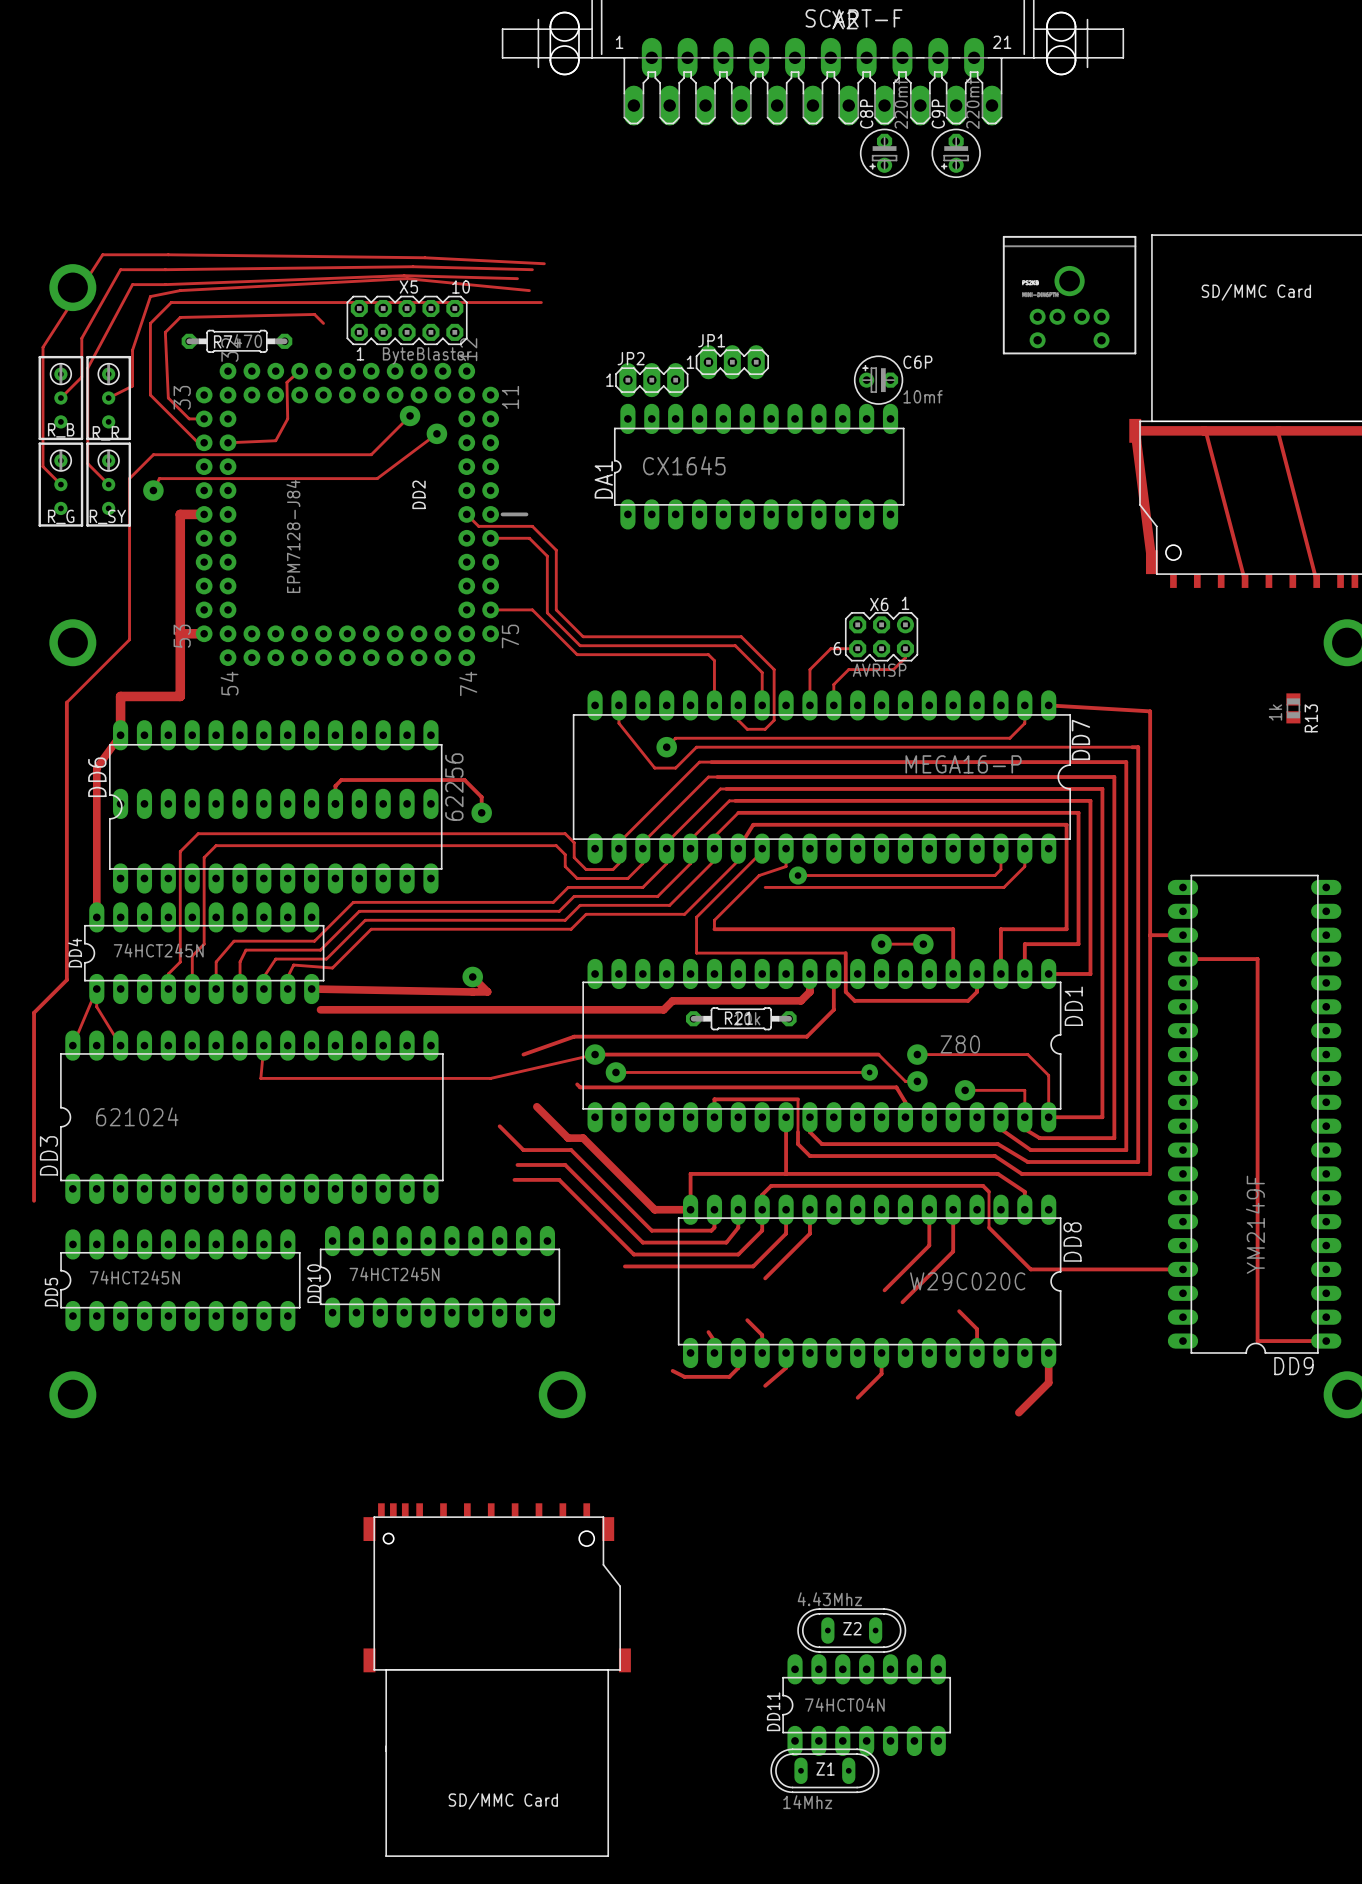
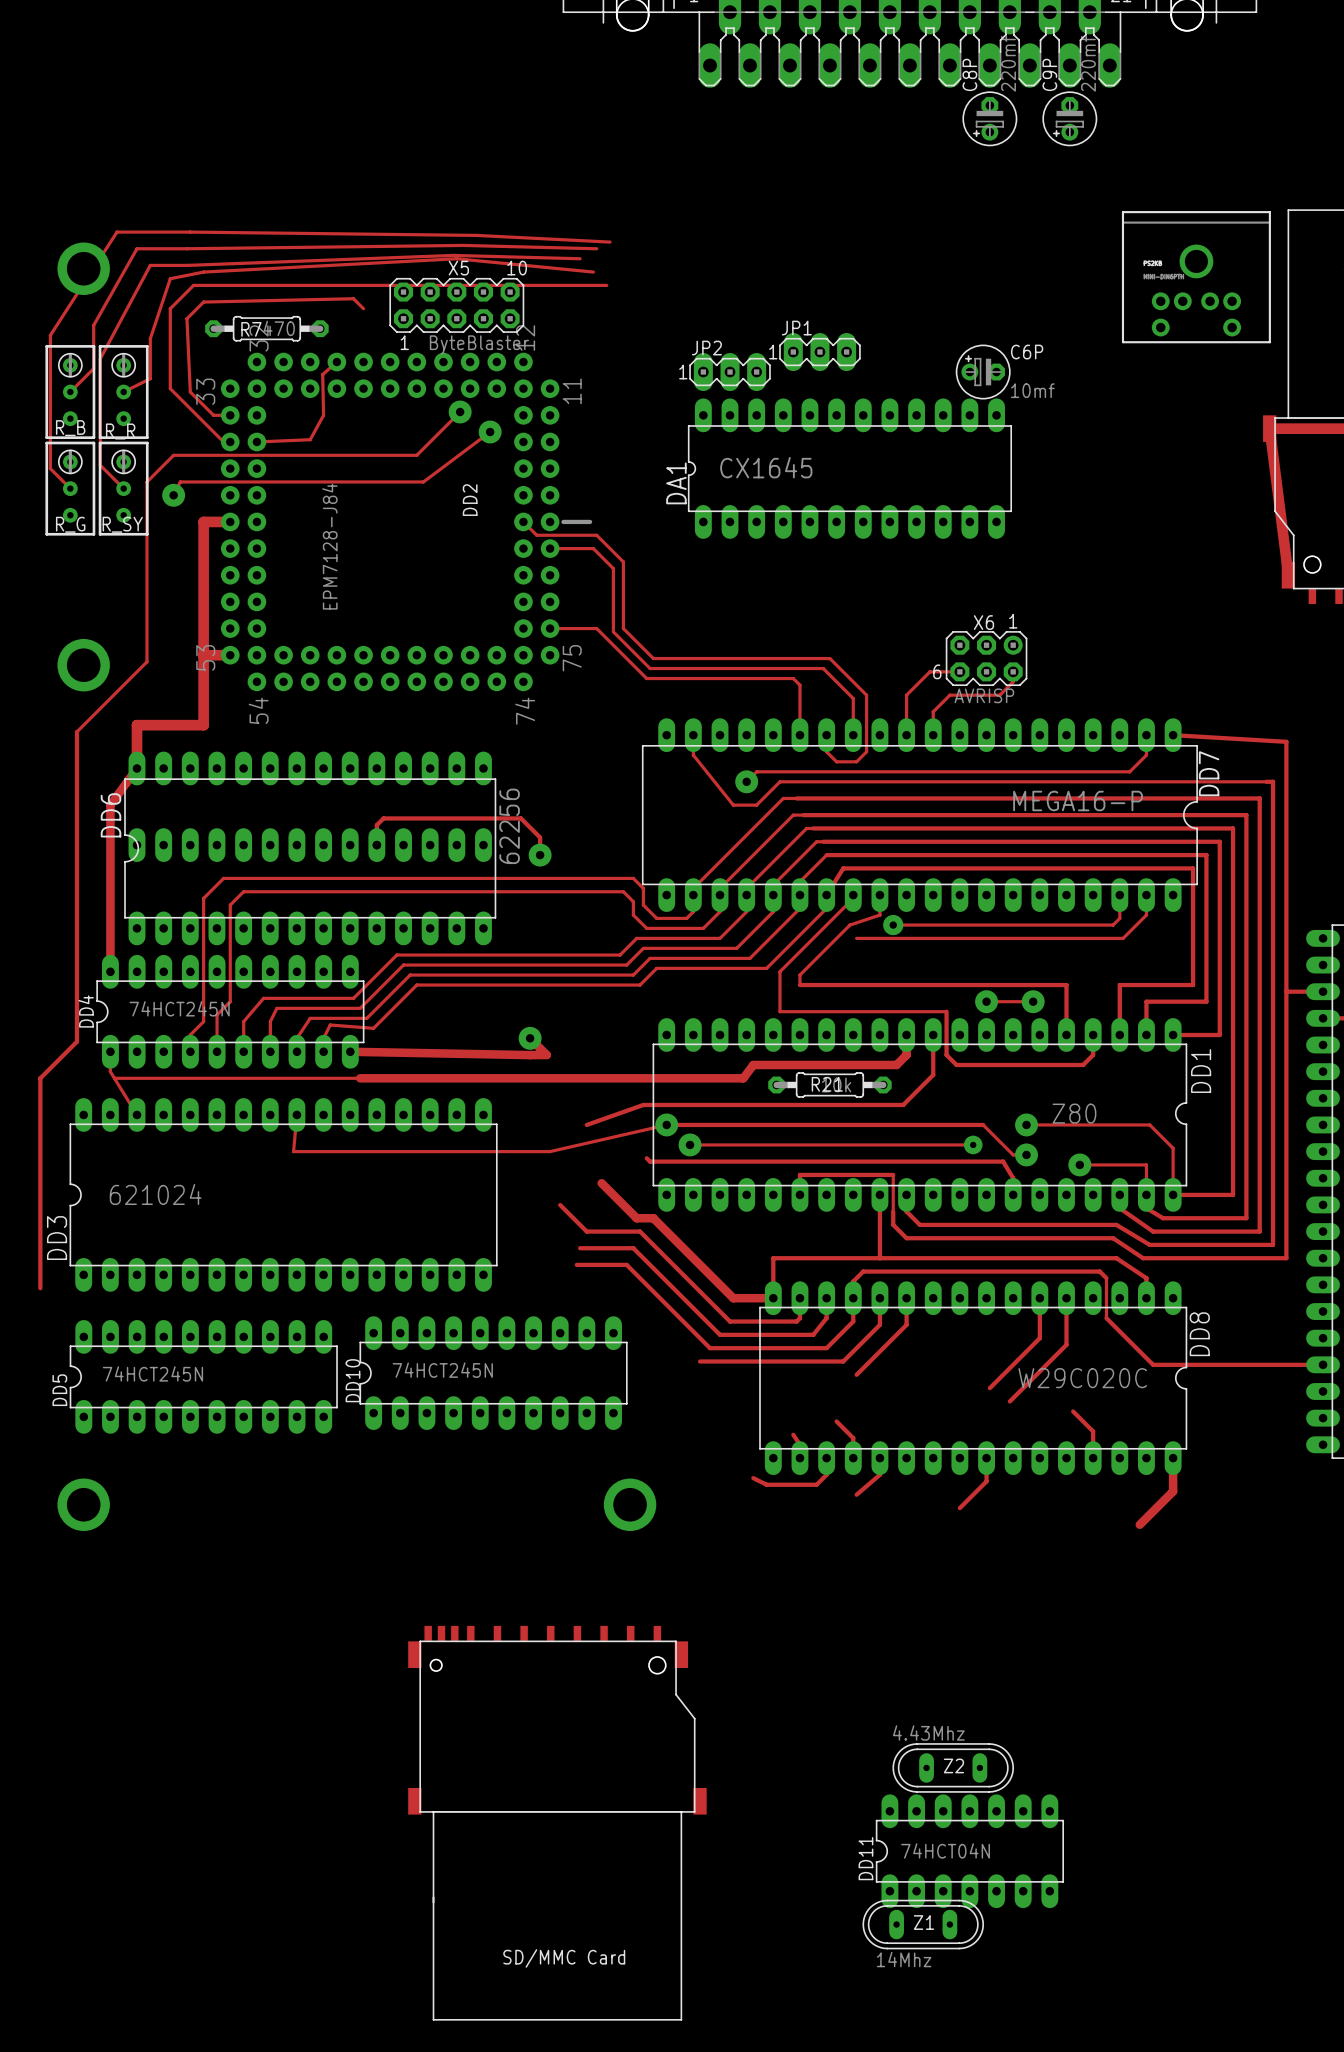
track: (96, 989) (72, 1045) -> none
track: (672, 1000) (663, 1009) (320, 1009) -> (753, 1064) (743, 1078) (114, 1078)

